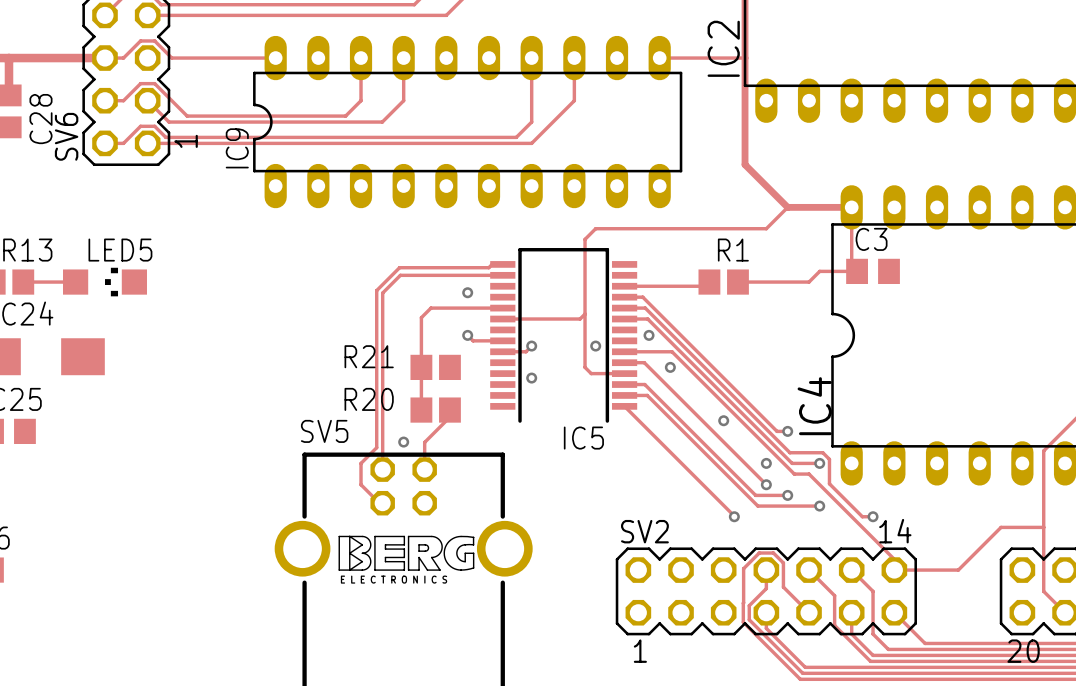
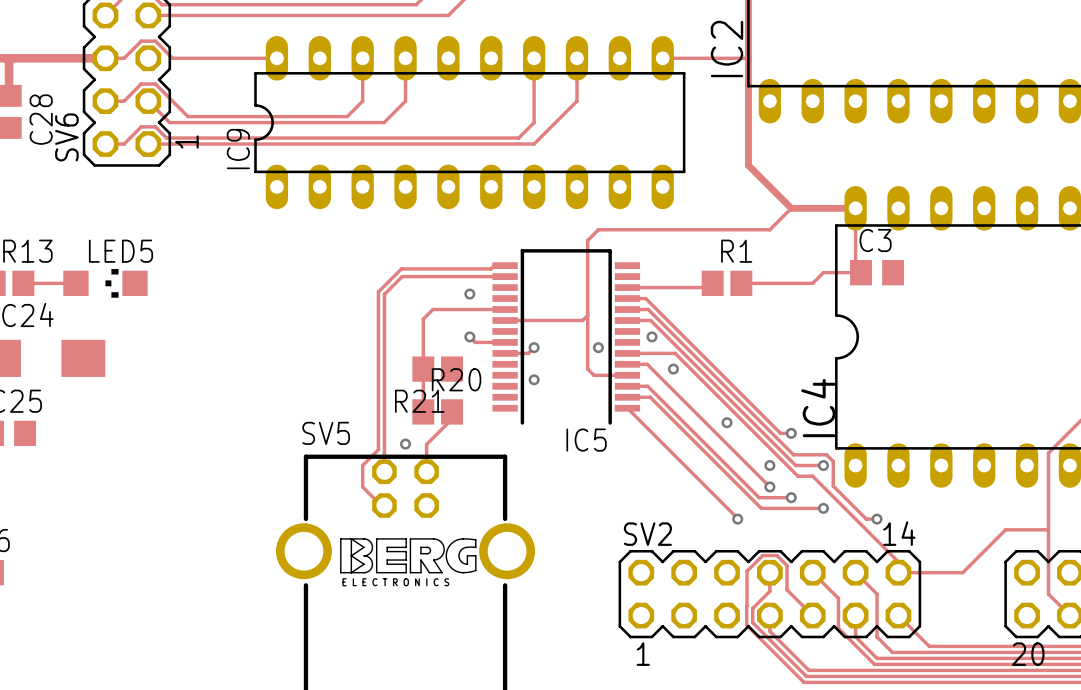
R21 name position: R21 (369, 356) -> R21 (419, 401)
R20 name position: R20 (369, 399) -> R20 (456, 379)

